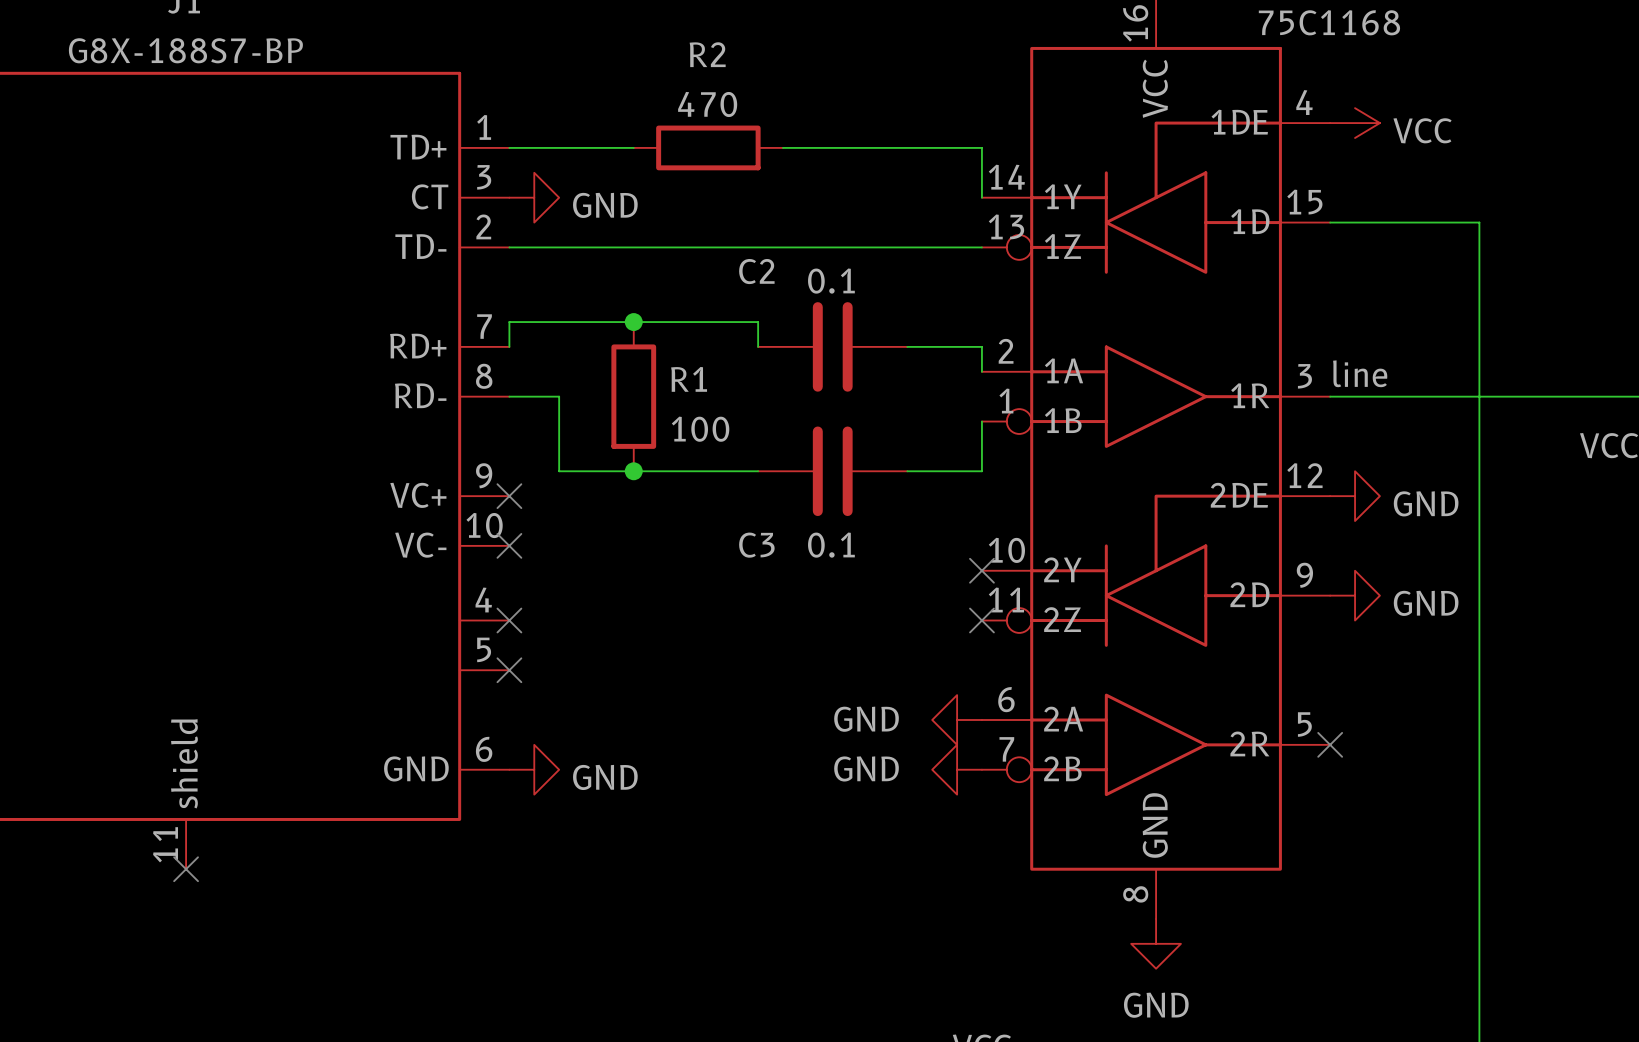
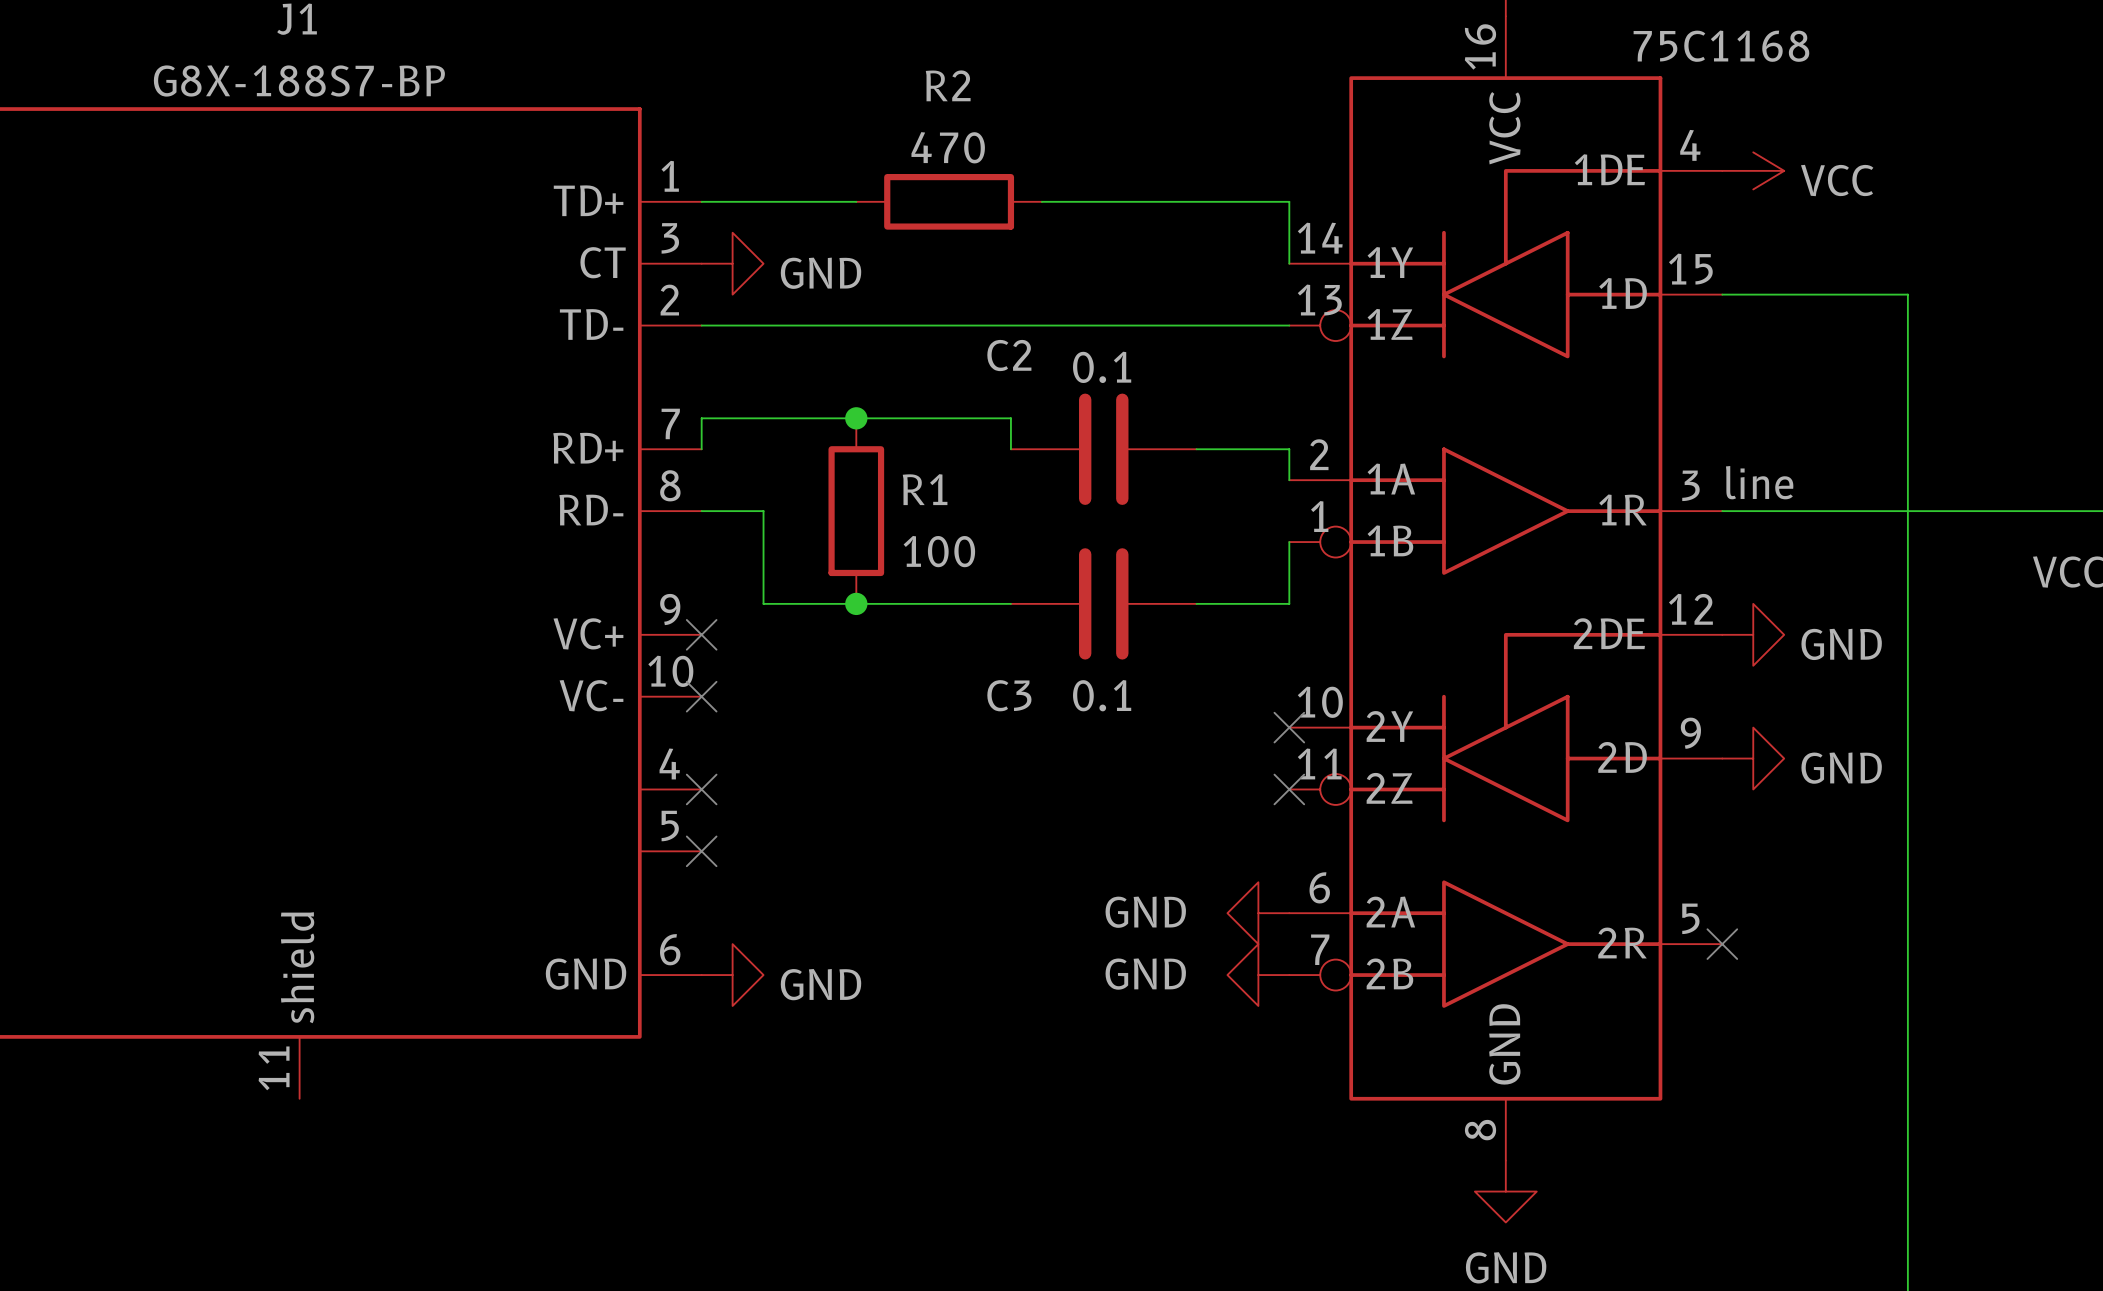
no-connect mark: (186, 869) -> none

